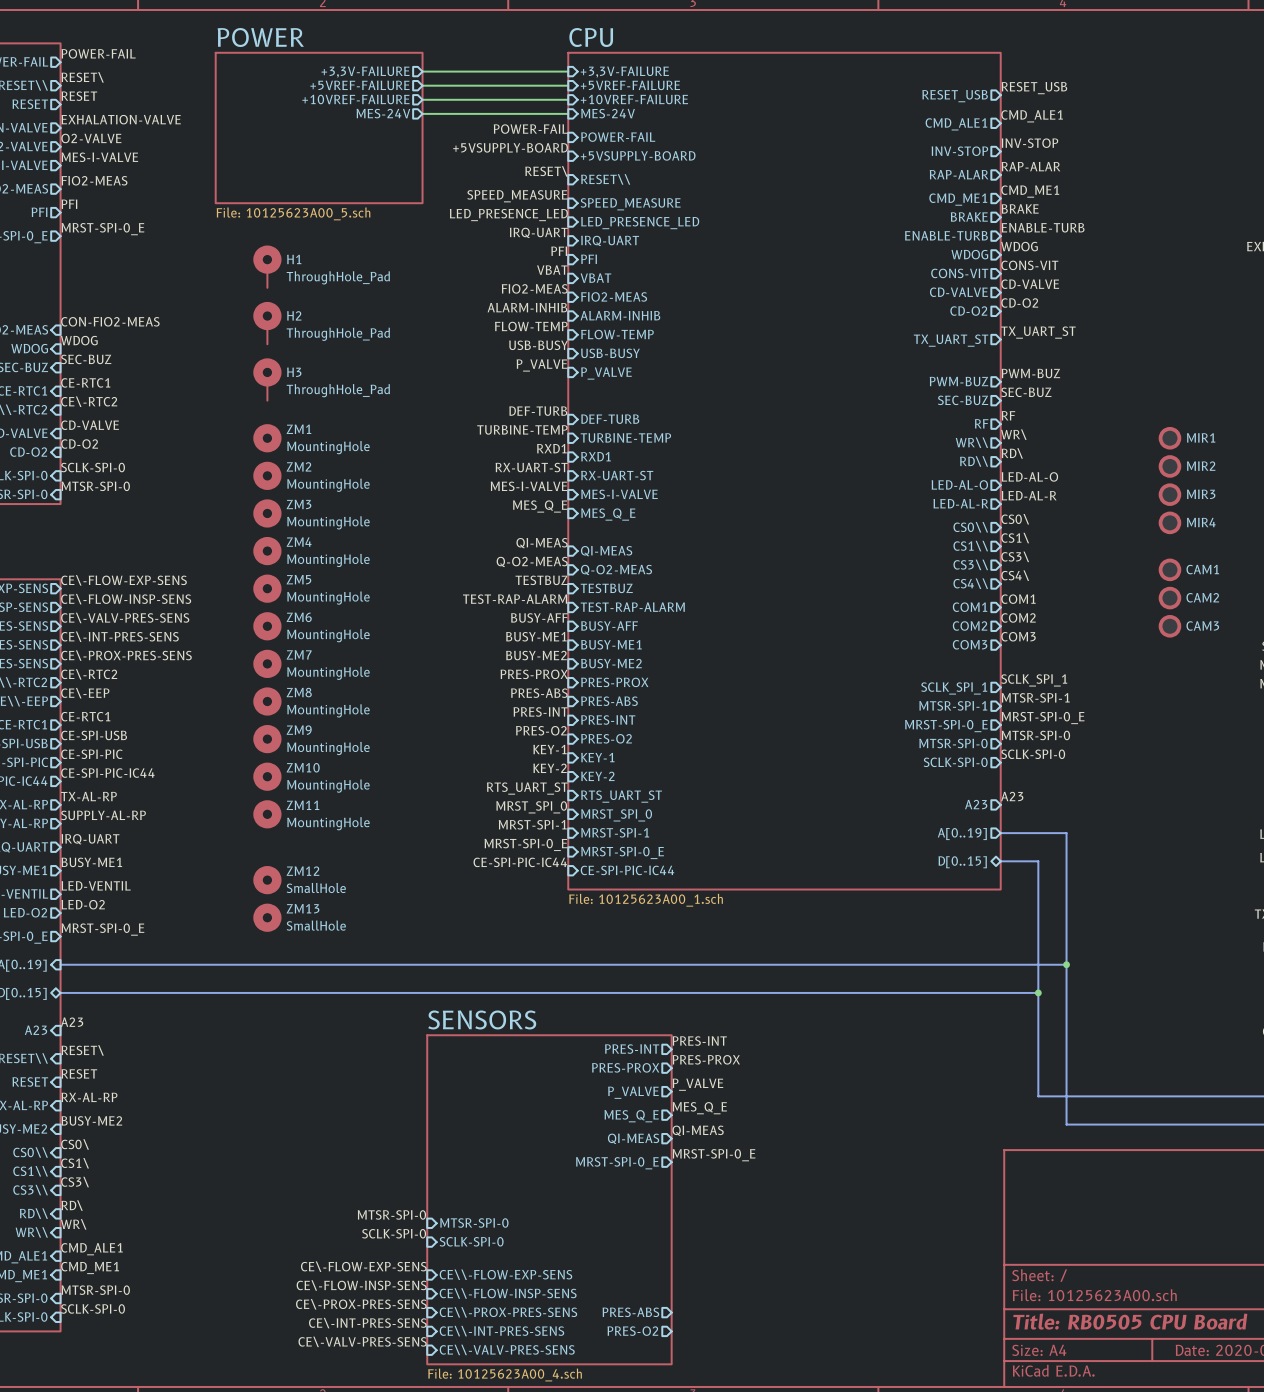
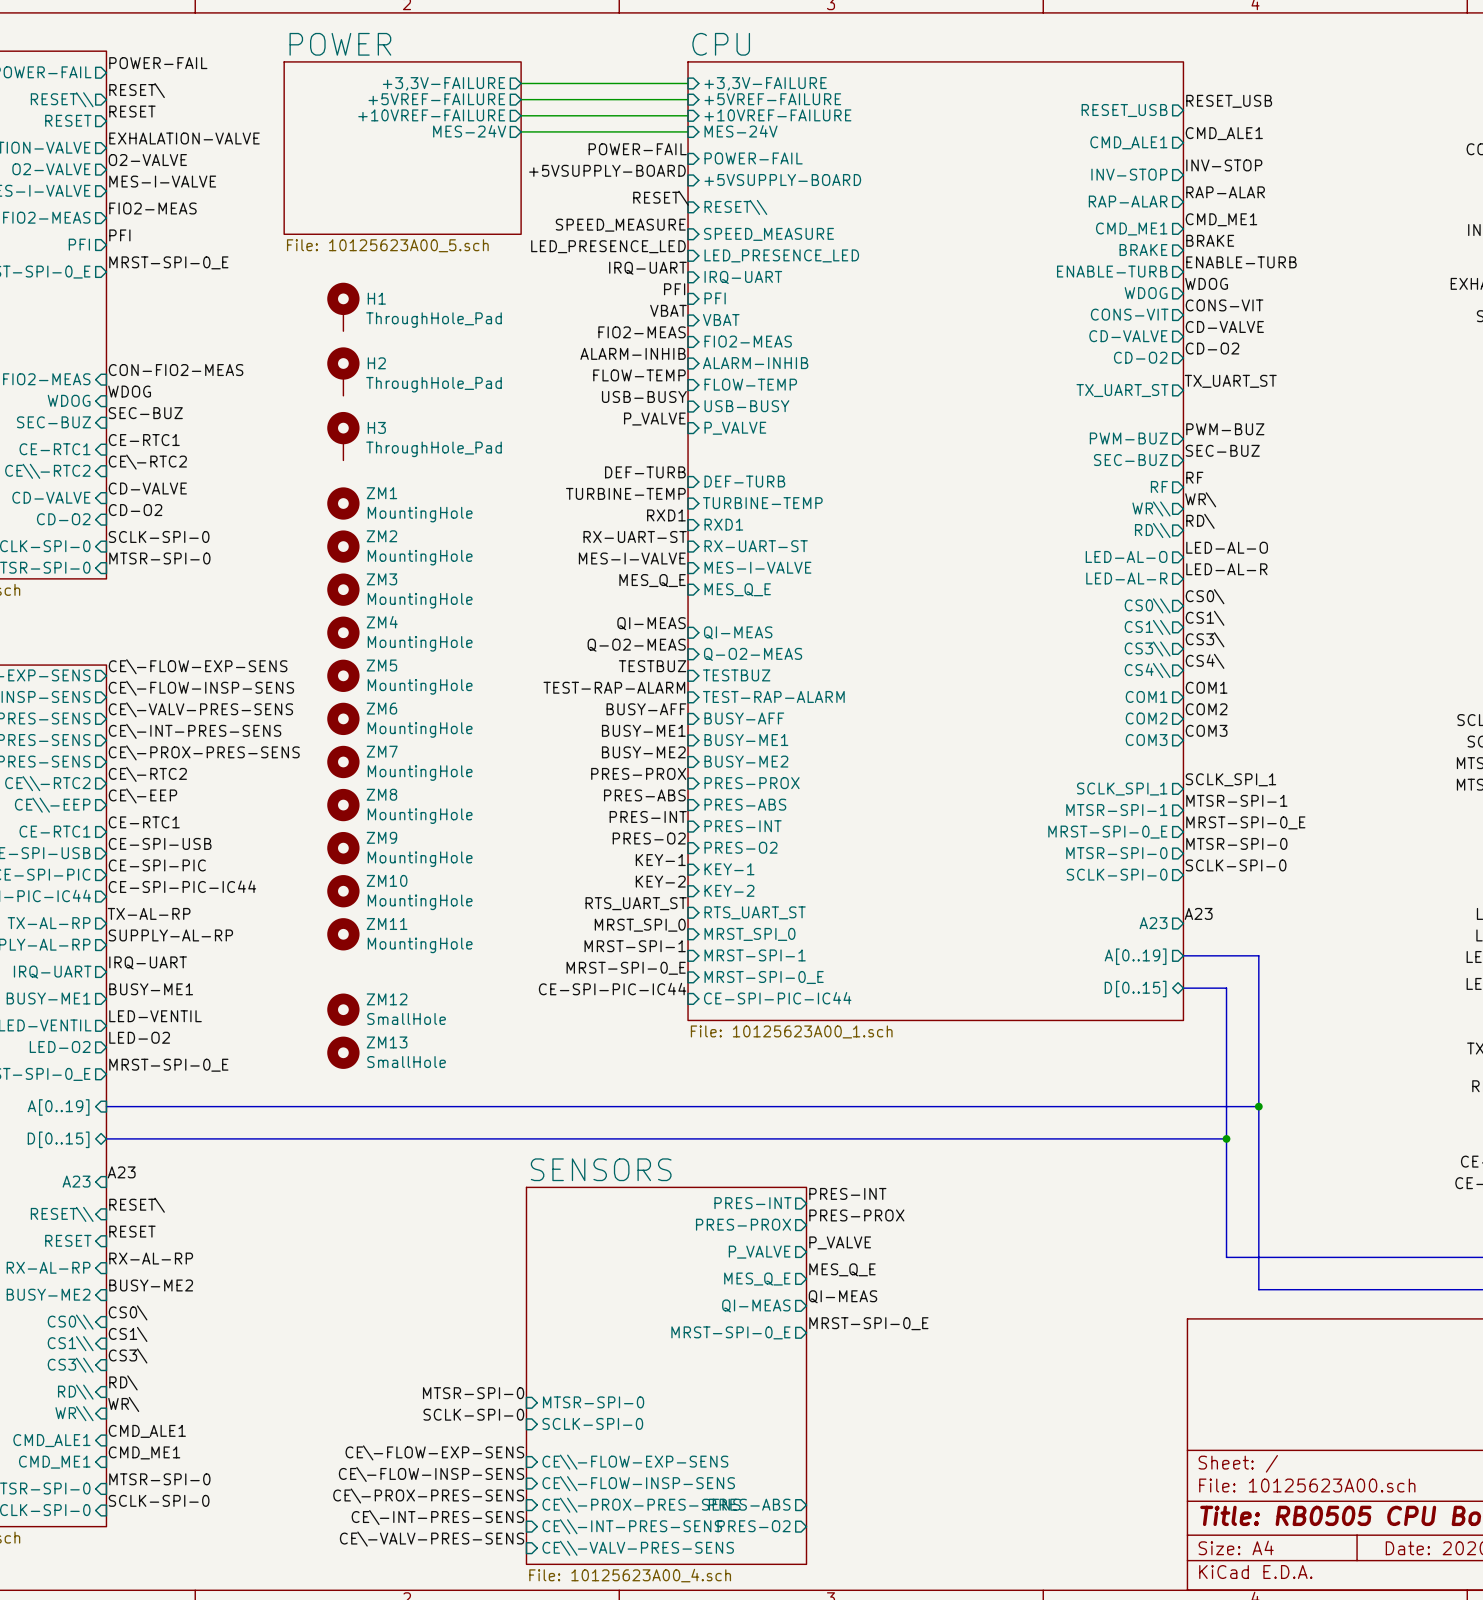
MIR1: (1169, 438) -> none
MIR2: (1169, 466) -> none
MIR3: (1169, 494) -> none
MIR4: (1169, 522) -> none
CAM1: (1169, 569) -> none
CAM2: (1169, 598) -> none
CAM3: (1169, 626) -> none

